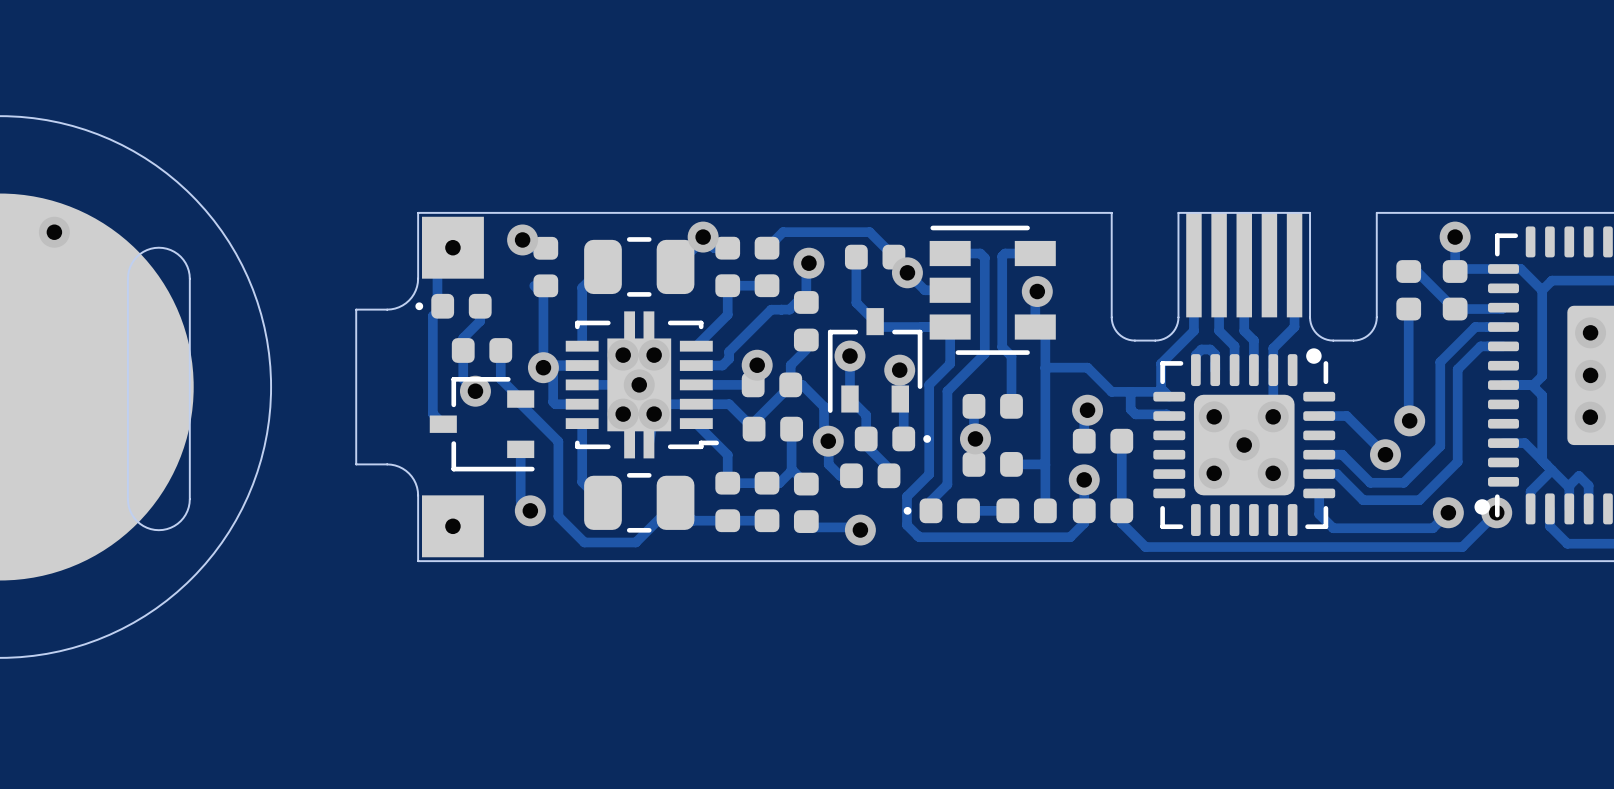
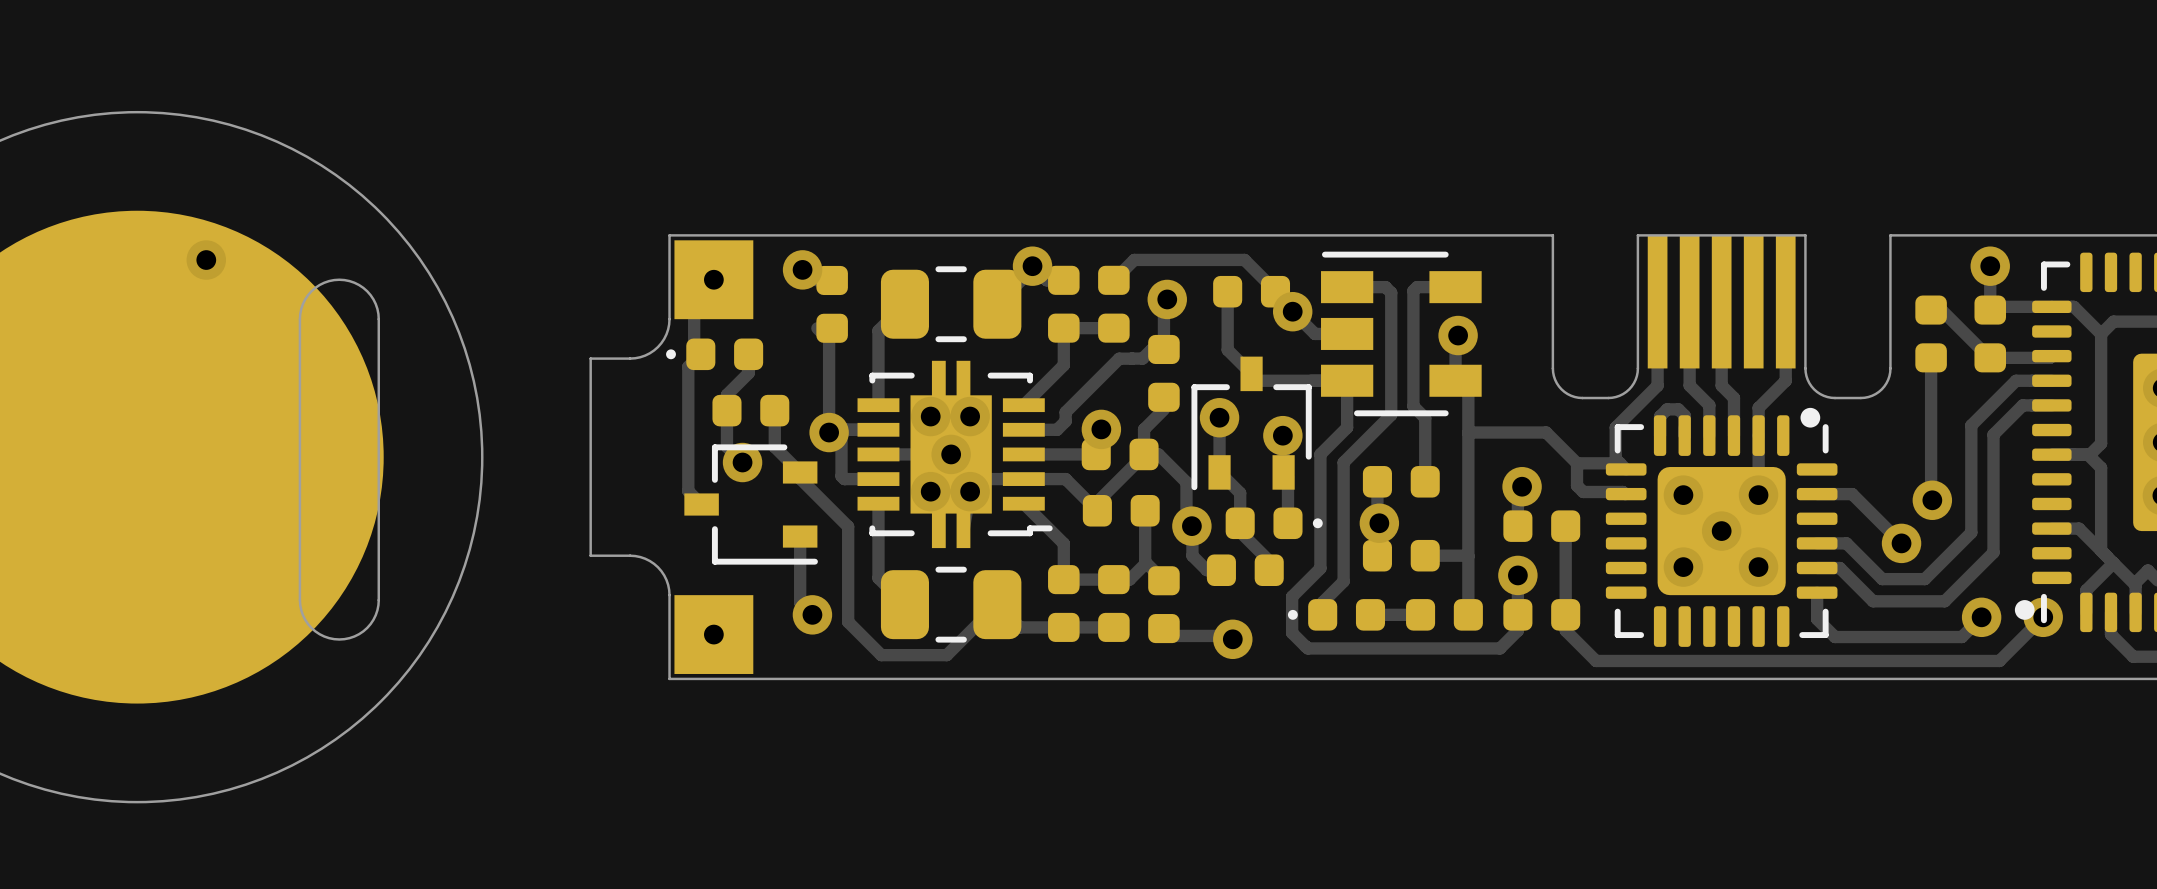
track: (1087, 367) (1111, 391) (1130, 391) -> (1522, 432) (1546, 432) (1577, 463)

